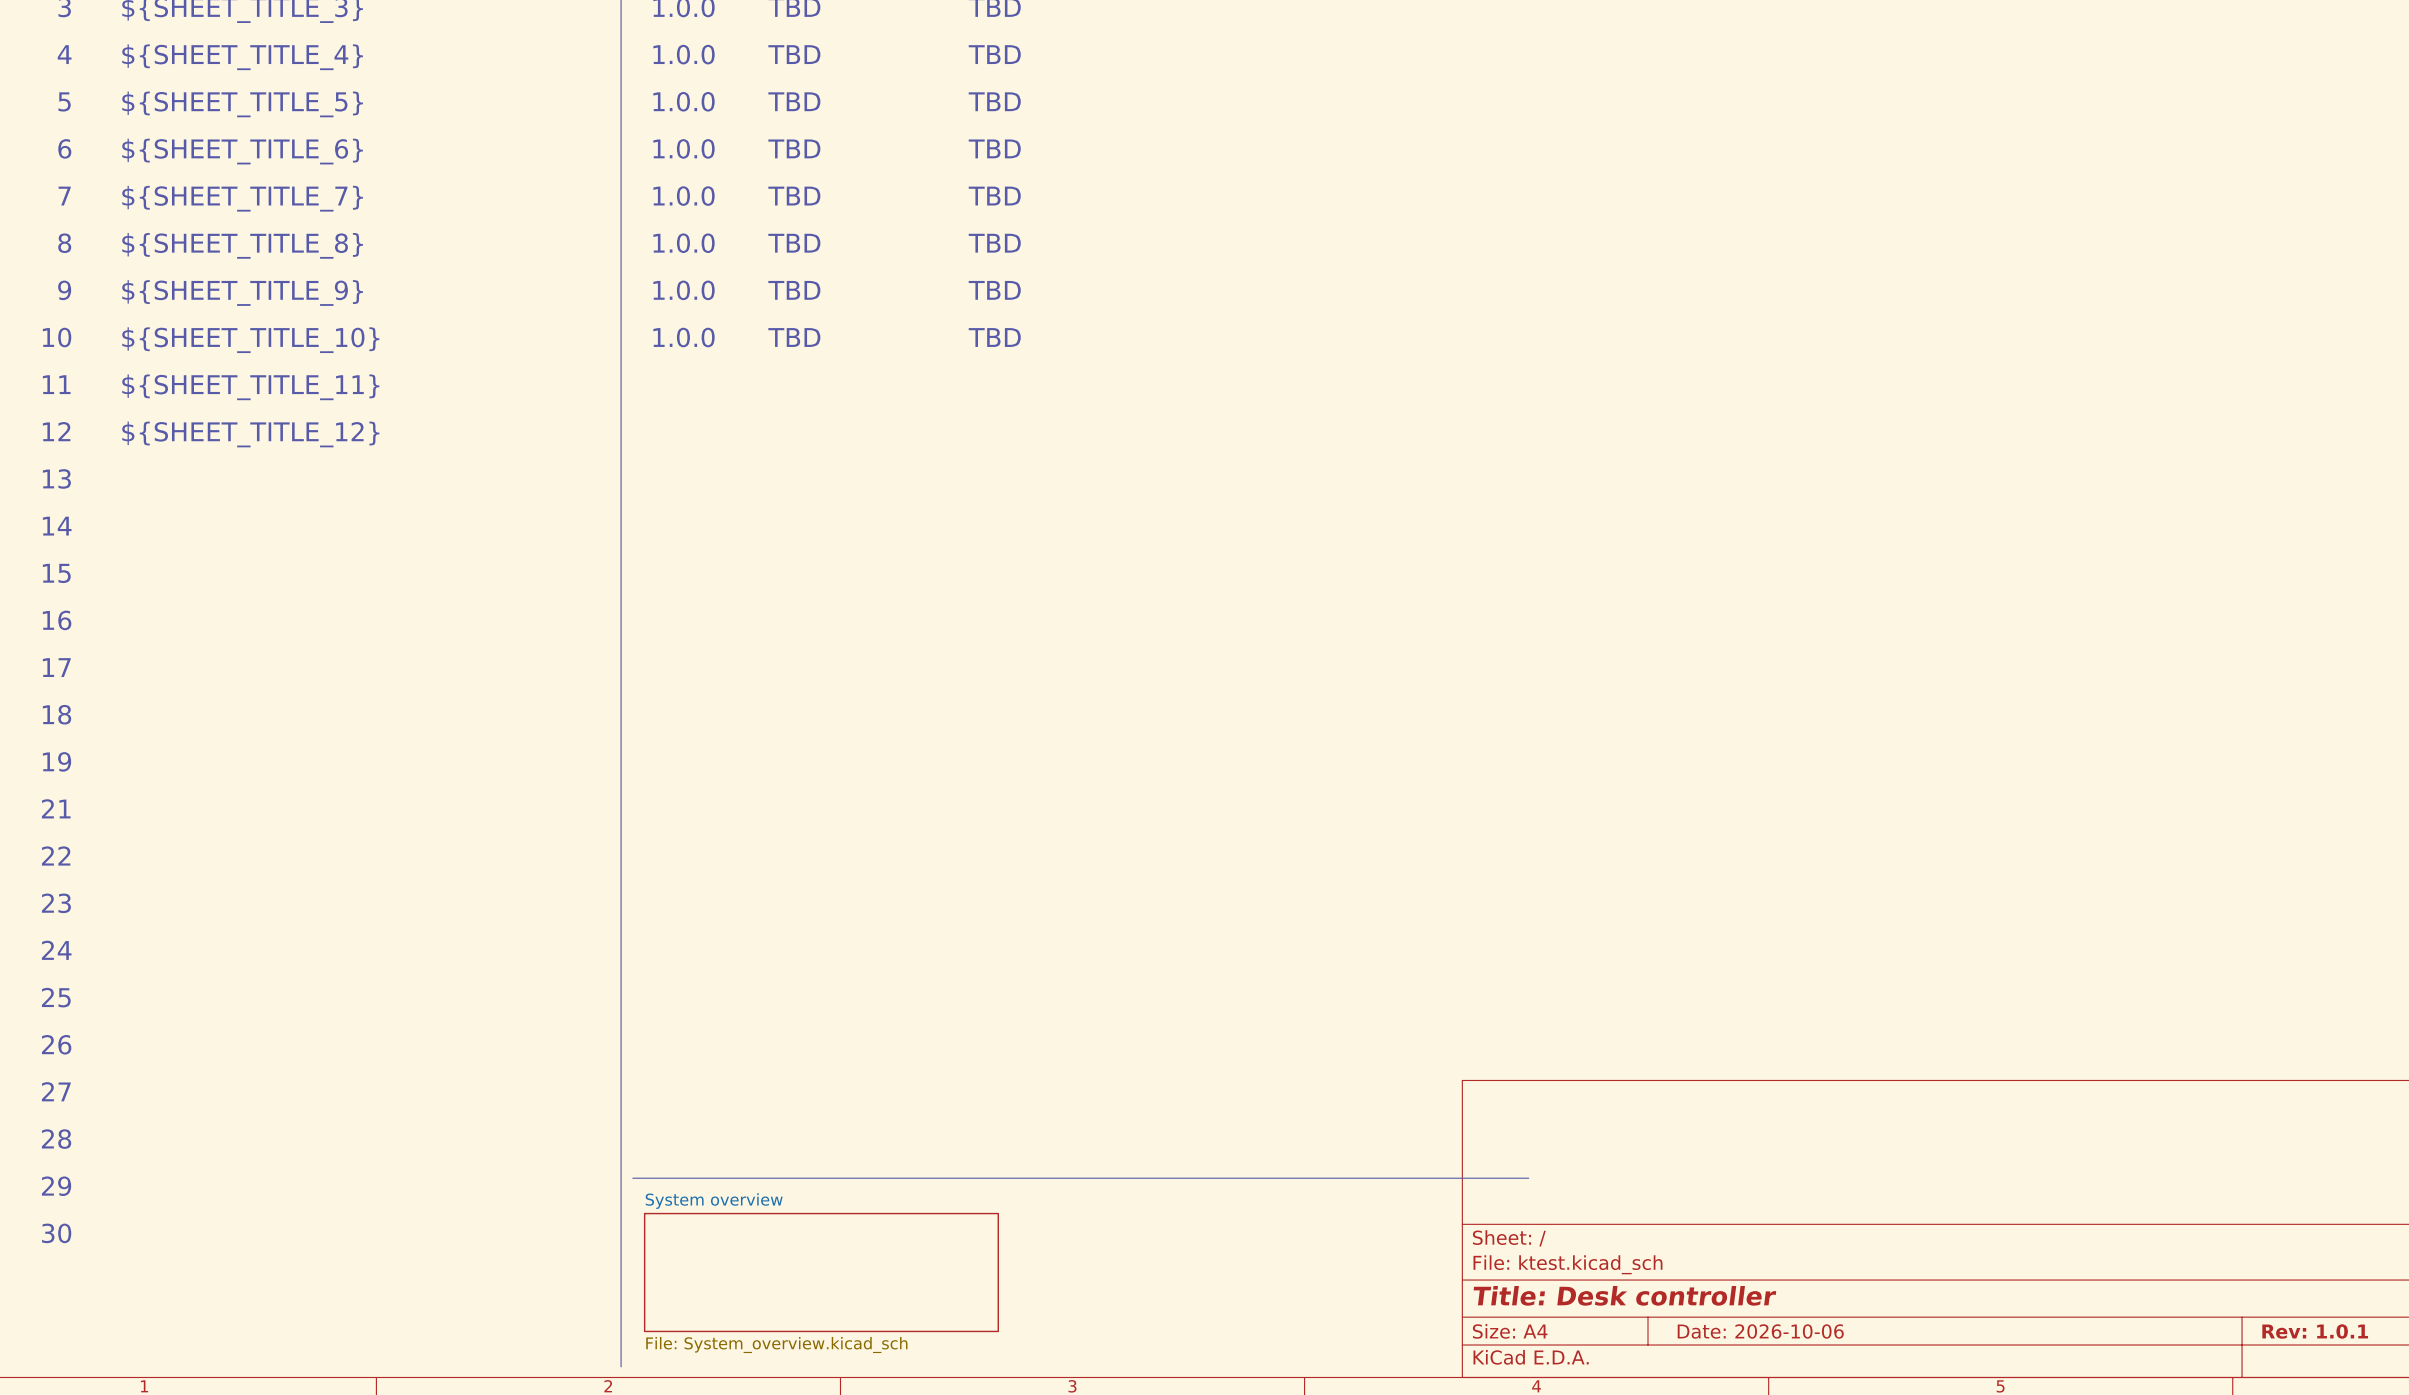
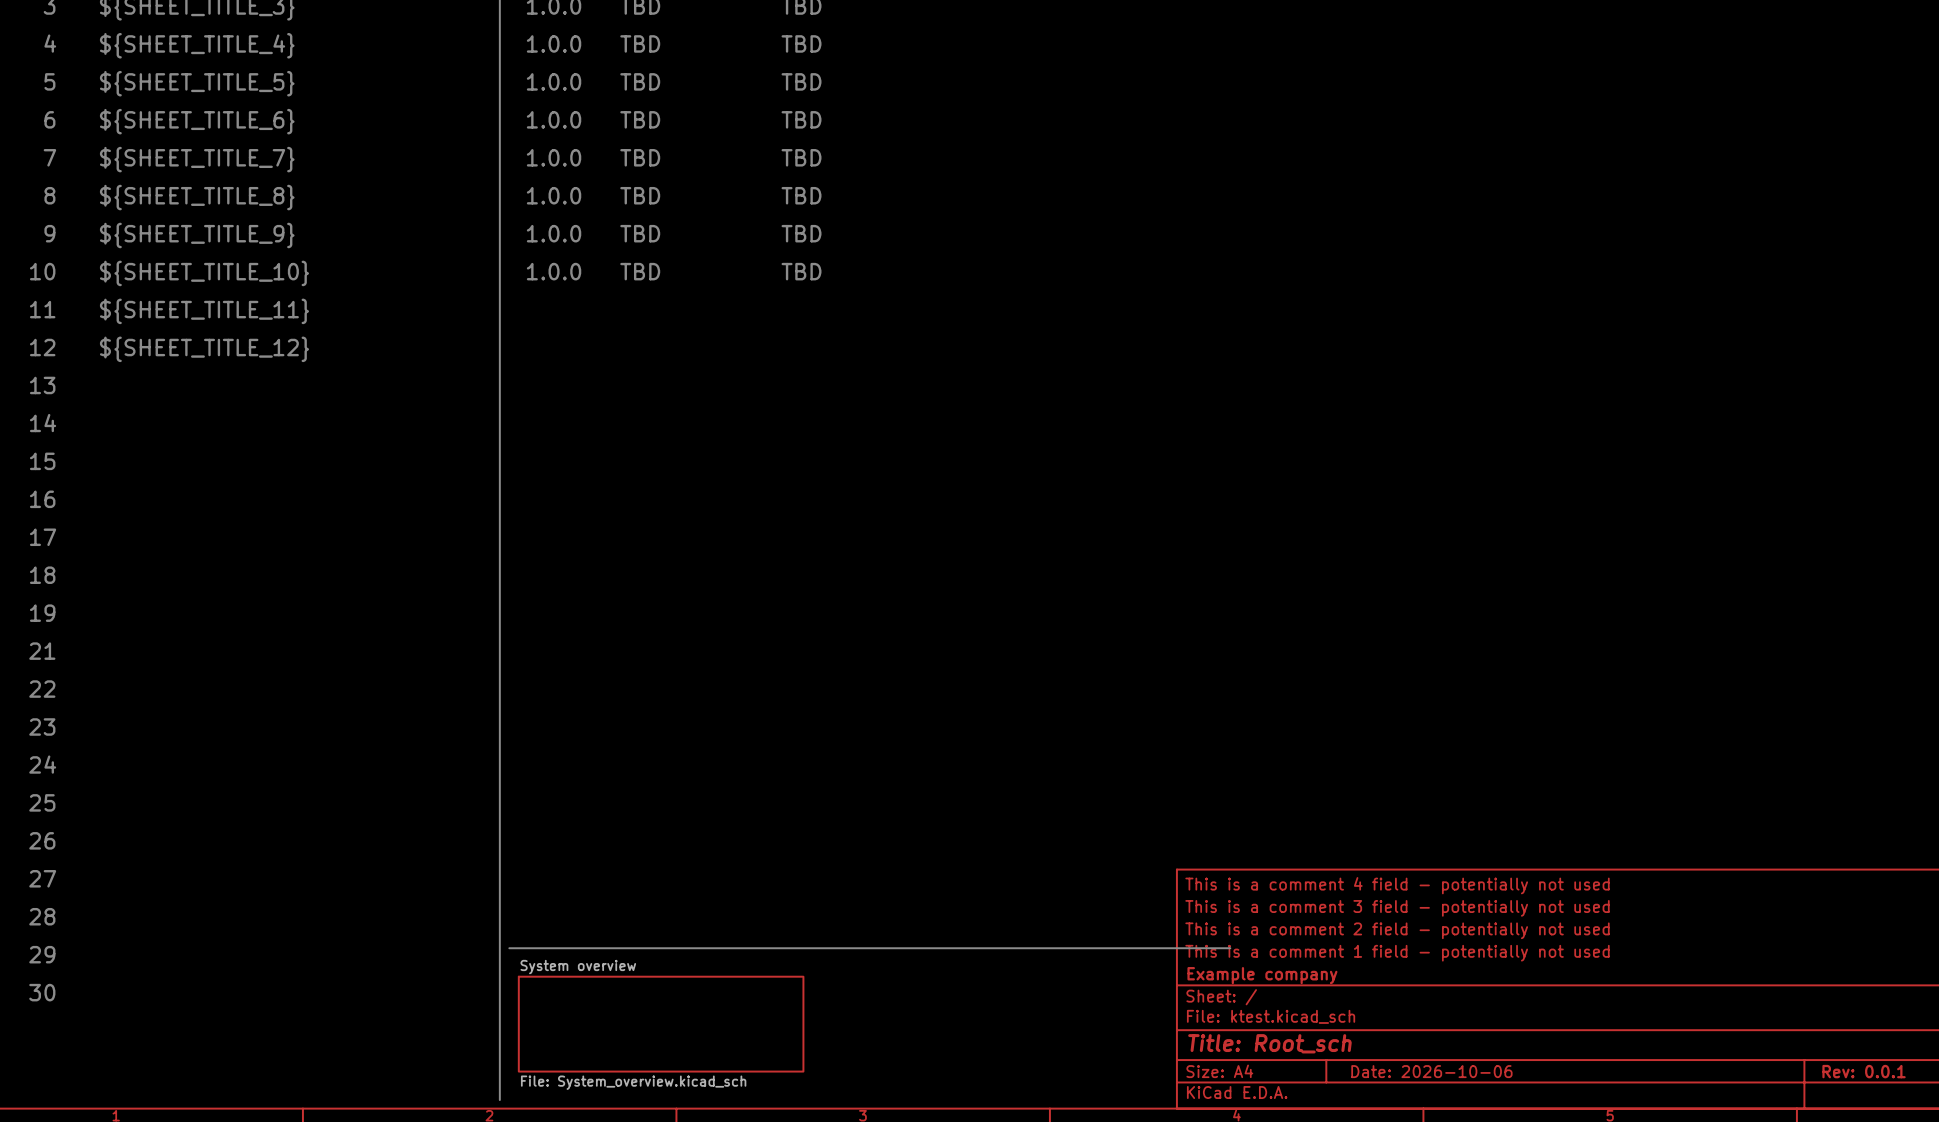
title block: none -> This is a comment 4 field - potentially not used (1397, 885)
title block: none -> This is a comment 3 field - potentially not used (1397, 908)
title block: none -> This is a comment 2 field - potentially not used (1397, 930)
title block: none -> This is a comment 1 field - potentially not used (1397, 953)
title block: none -> Example company (1262, 975)
title block: Title: Desk controller (1624, 1295) -> Title: Root_sch (1269, 1043)
title block: Rev: 1.0.1 (2315, 1331) -> Rev: 0.0.1 (1864, 1071)

